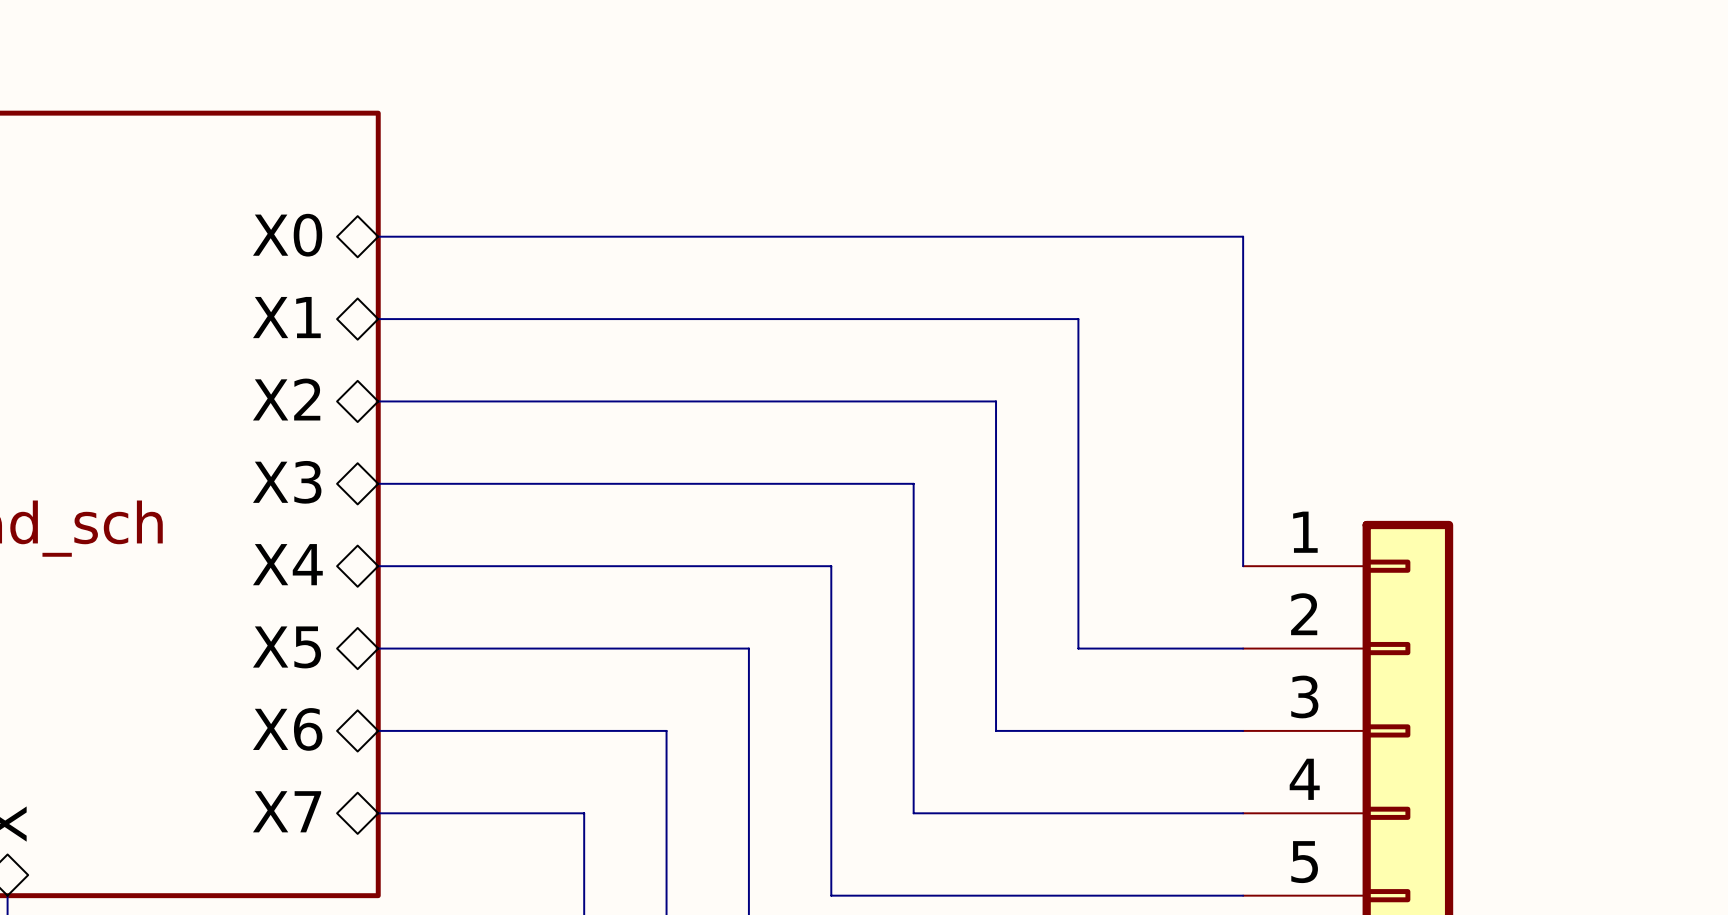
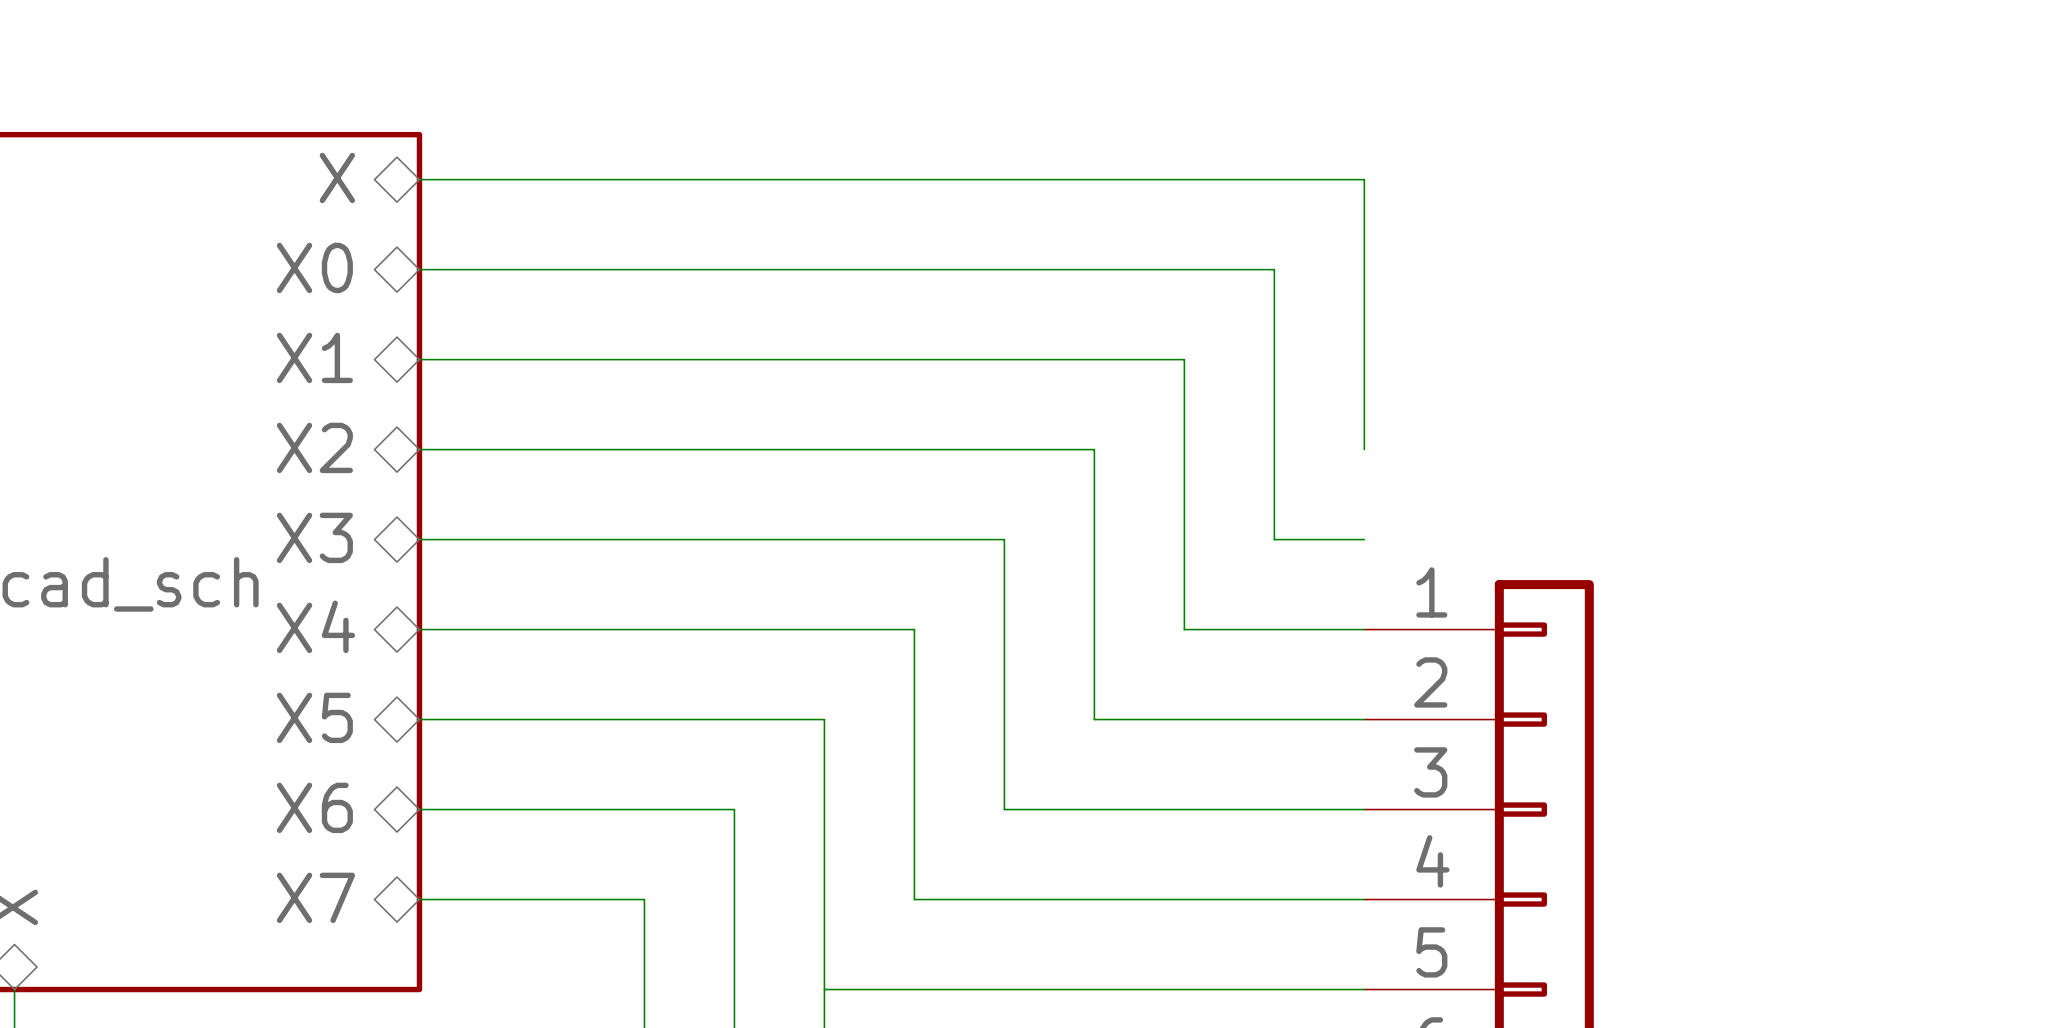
sheet pin: none -> X (337, 177)
wire: none -> (419, 179) (1364, 179) (1364, 269)
wire: (1160, 236) (1243, 236) -> (1274, 269) (1274, 539) (1364, 539)
wire: (1243, 401) (1243, 566) -> (1184, 629) (1364, 629)
wire: (1078, 566) (1078, 648) -> (1094, 719) (1184, 719)
wire: (996, 648) (996, 730) -> (1004, 809) (1094, 809)
wire: (913, 730) (913, 813) -> (914, 899) (1004, 899)
wire: (831, 813) (831, 895) -> (824, 989) (914, 989)

